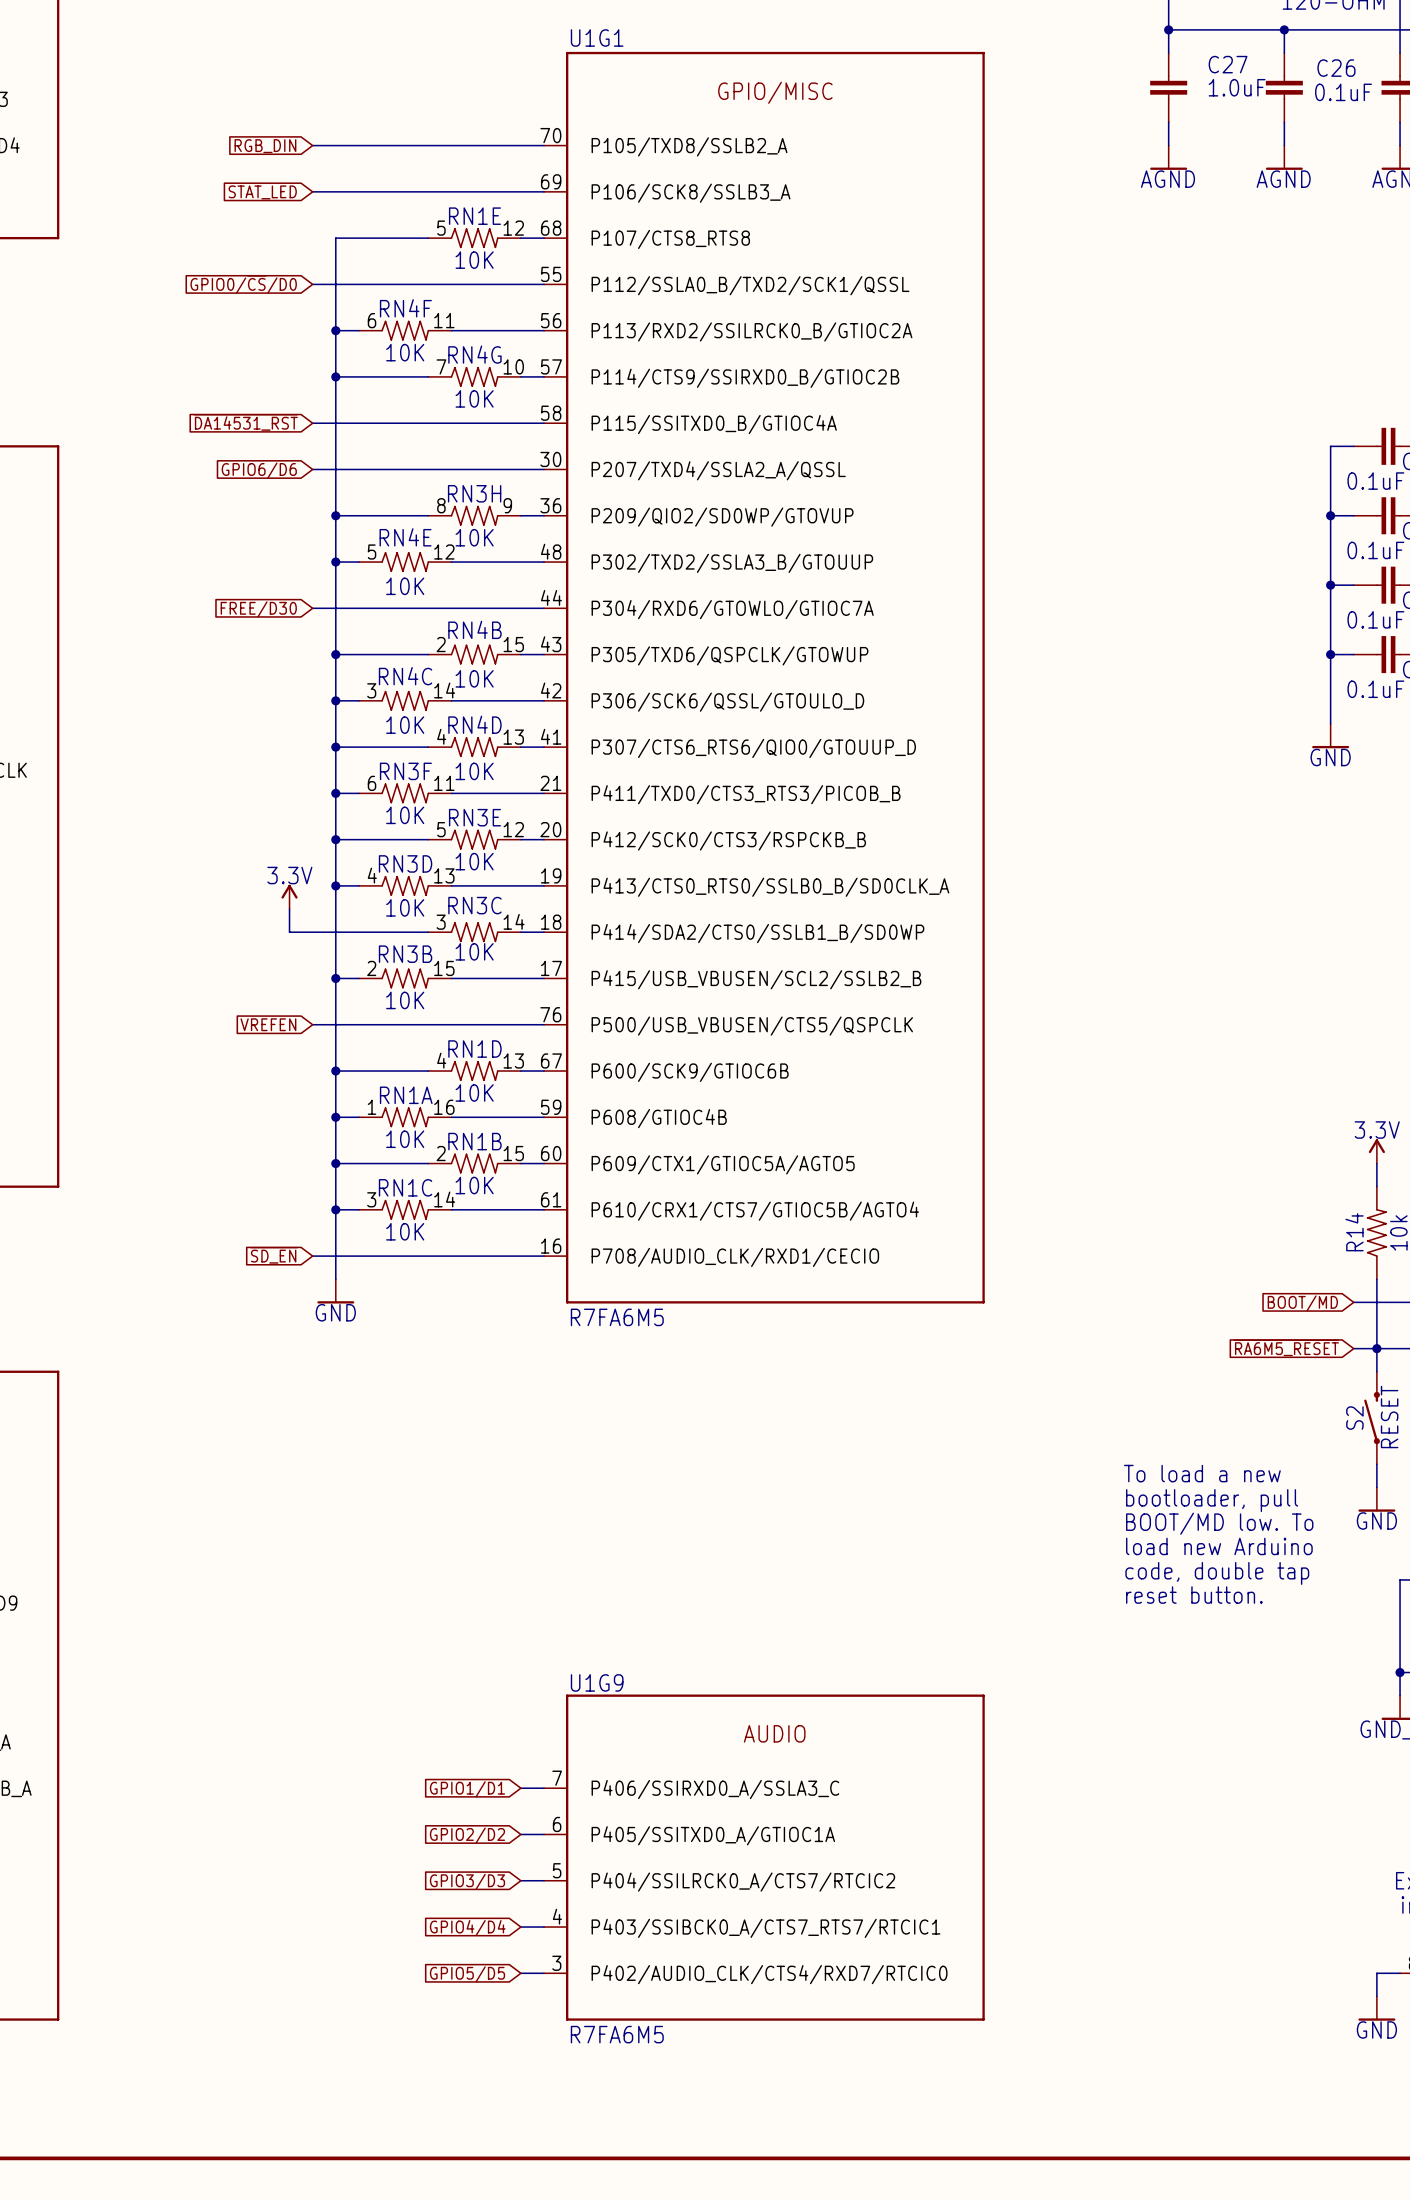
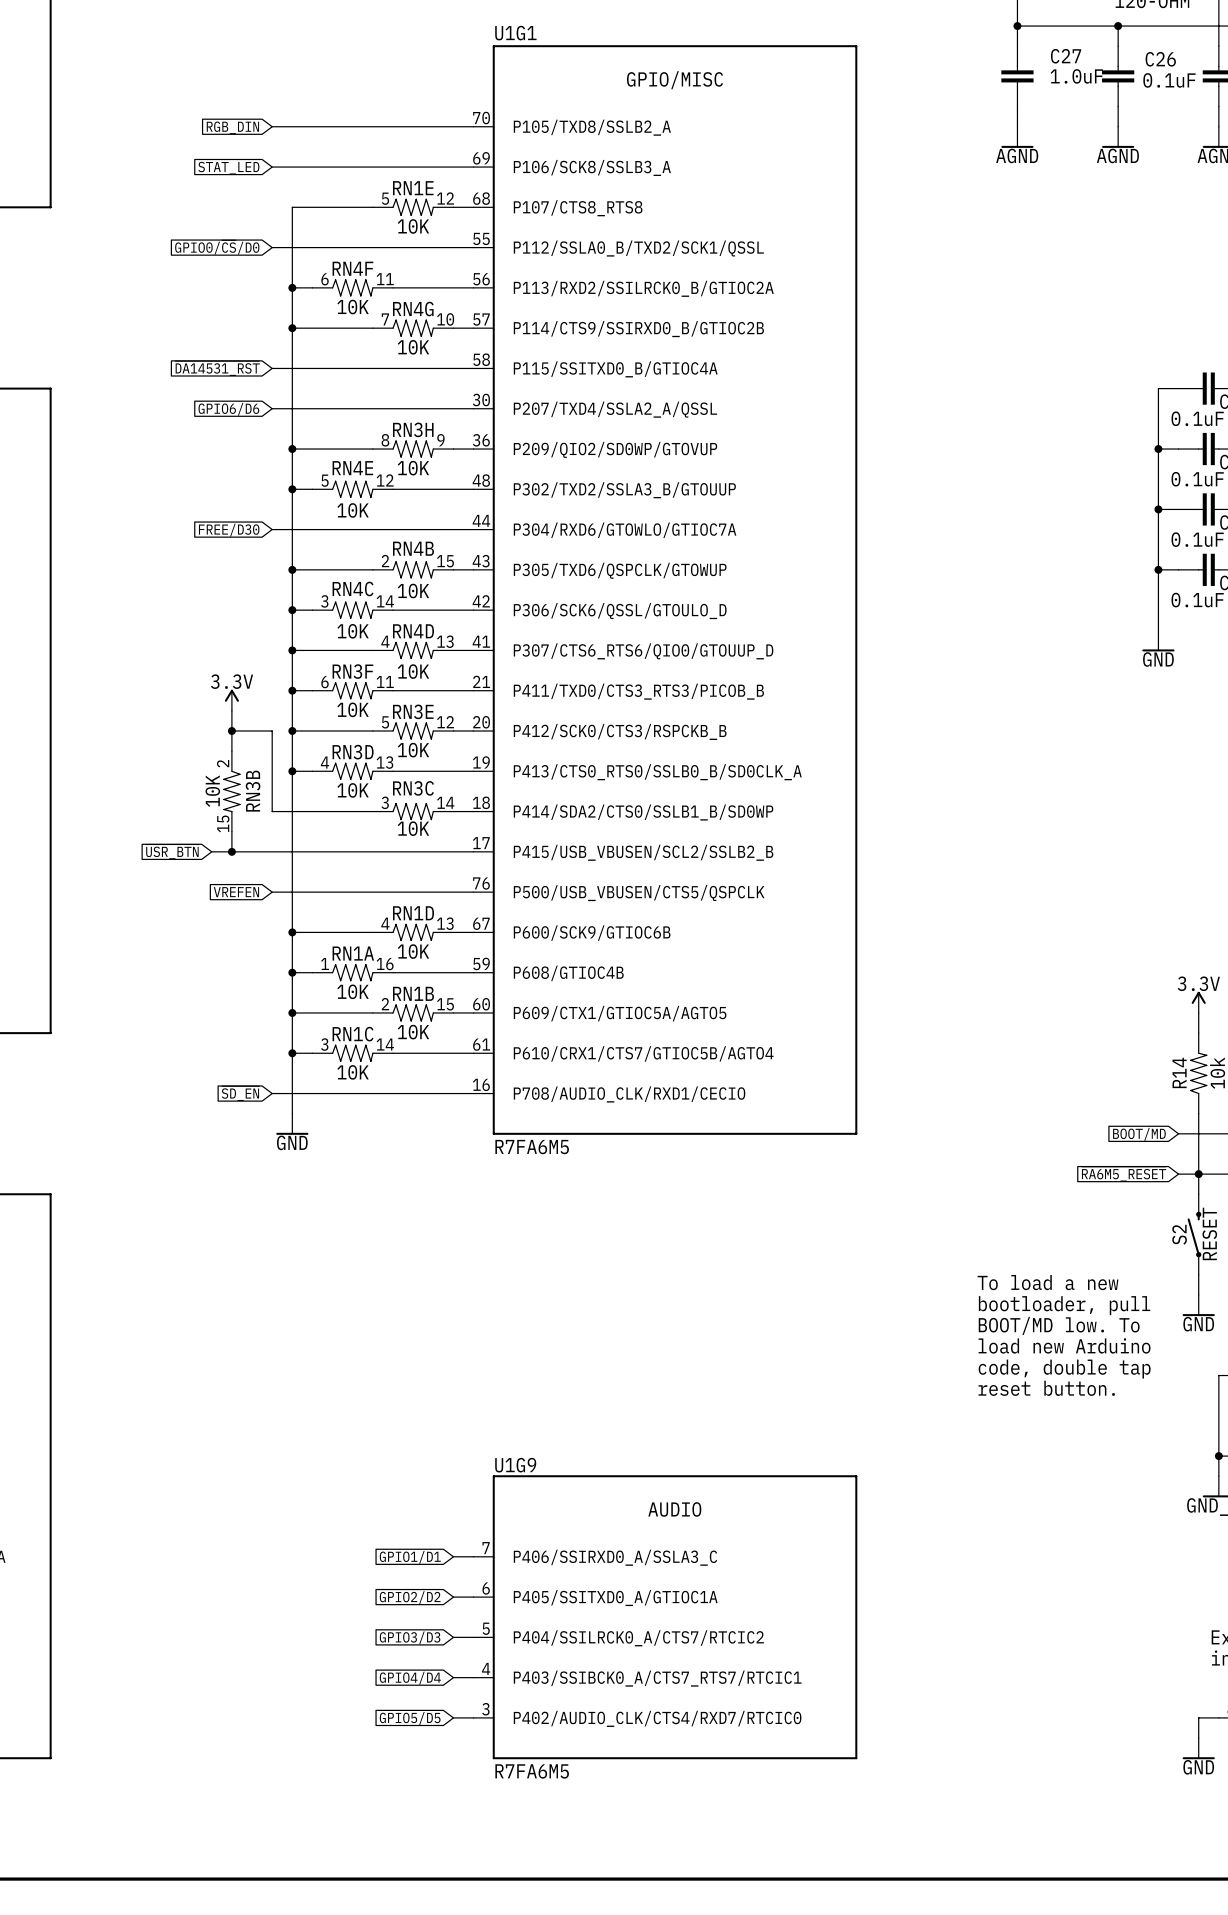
wire: none -> (231, 710) (231, 751)
junction: none -> (231, 730)
power symbol position: 3.3V (289, 896) -> 3.3V (231, 700)
wire: (289, 909) (289, 932) (312, 932) -> (231, 730) (272, 730) (272, 811)
wire: none -> (231, 831) (231, 851)
global label: none -> ~{USR_BTN} (172, 851)
wire: none -> (211, 851) (292, 851)
junction: none -> (231, 851)
junction: (335, 978) -> none
RN3B rotation: 0° (405, 978) -> 90° clockwise (231, 791)
RN3B position: (405, 978) -> (231, 791)

